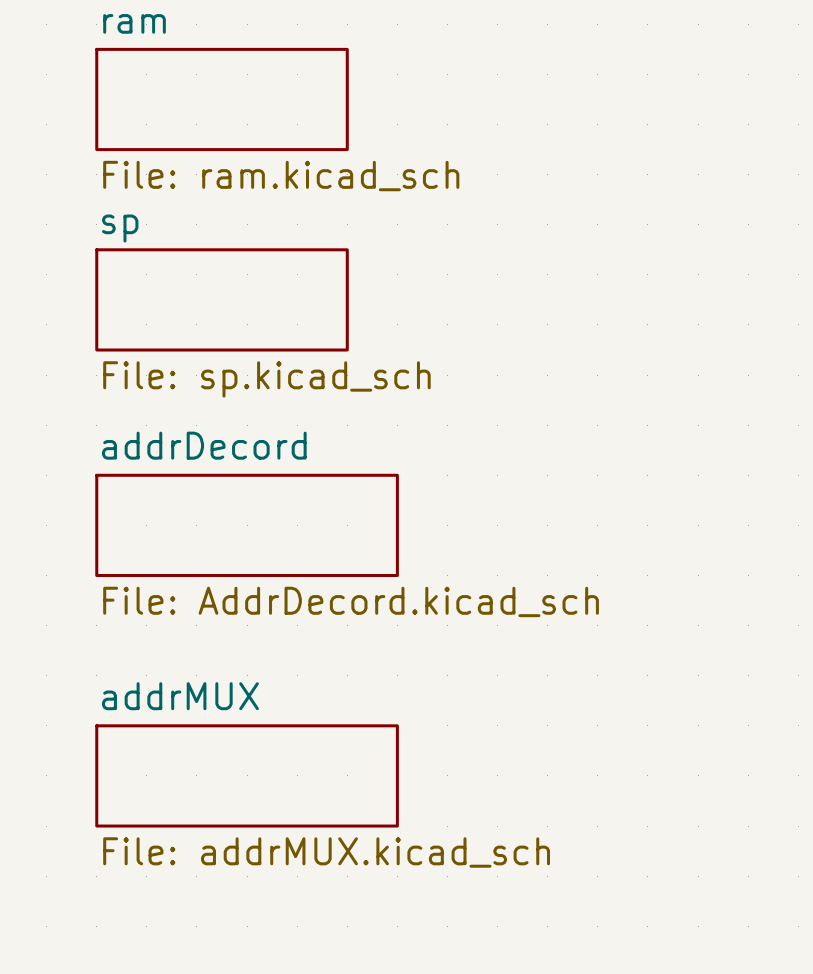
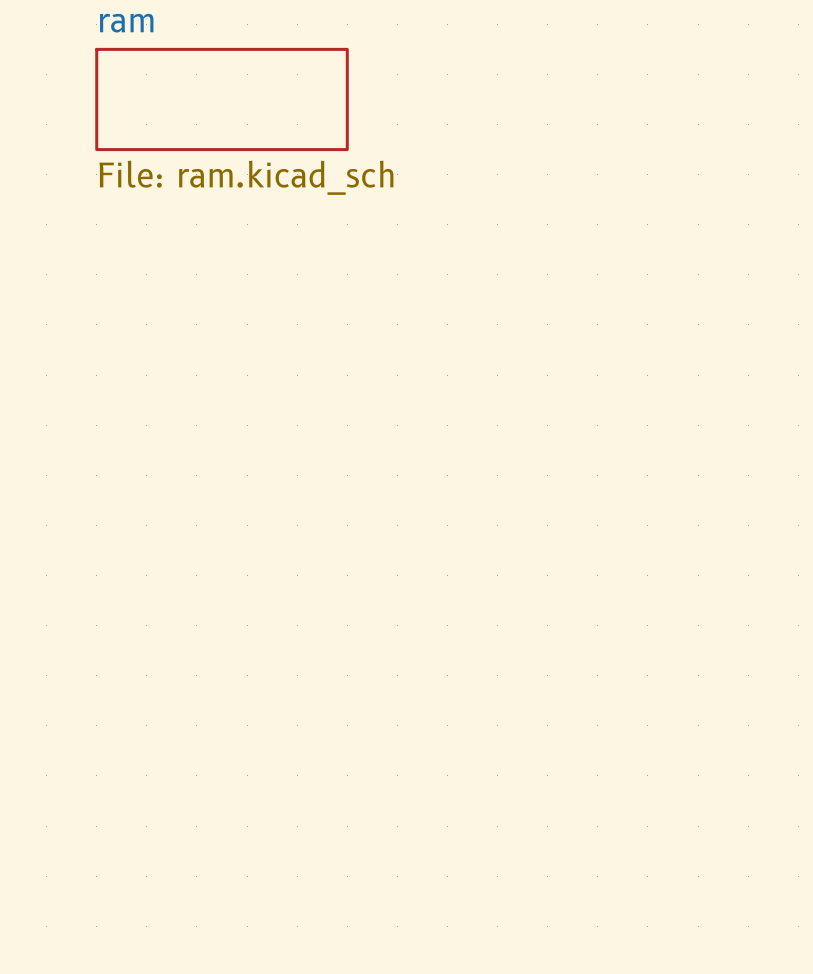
sheet sp: File: sp.kicad_sch (222, 299) -> none
sheet addrDecord: File: AddrDecord.kicad_sch (247, 525) -> none
sheet addrMUX: File: addrMUX.kicad_sch (247, 775) -> none

